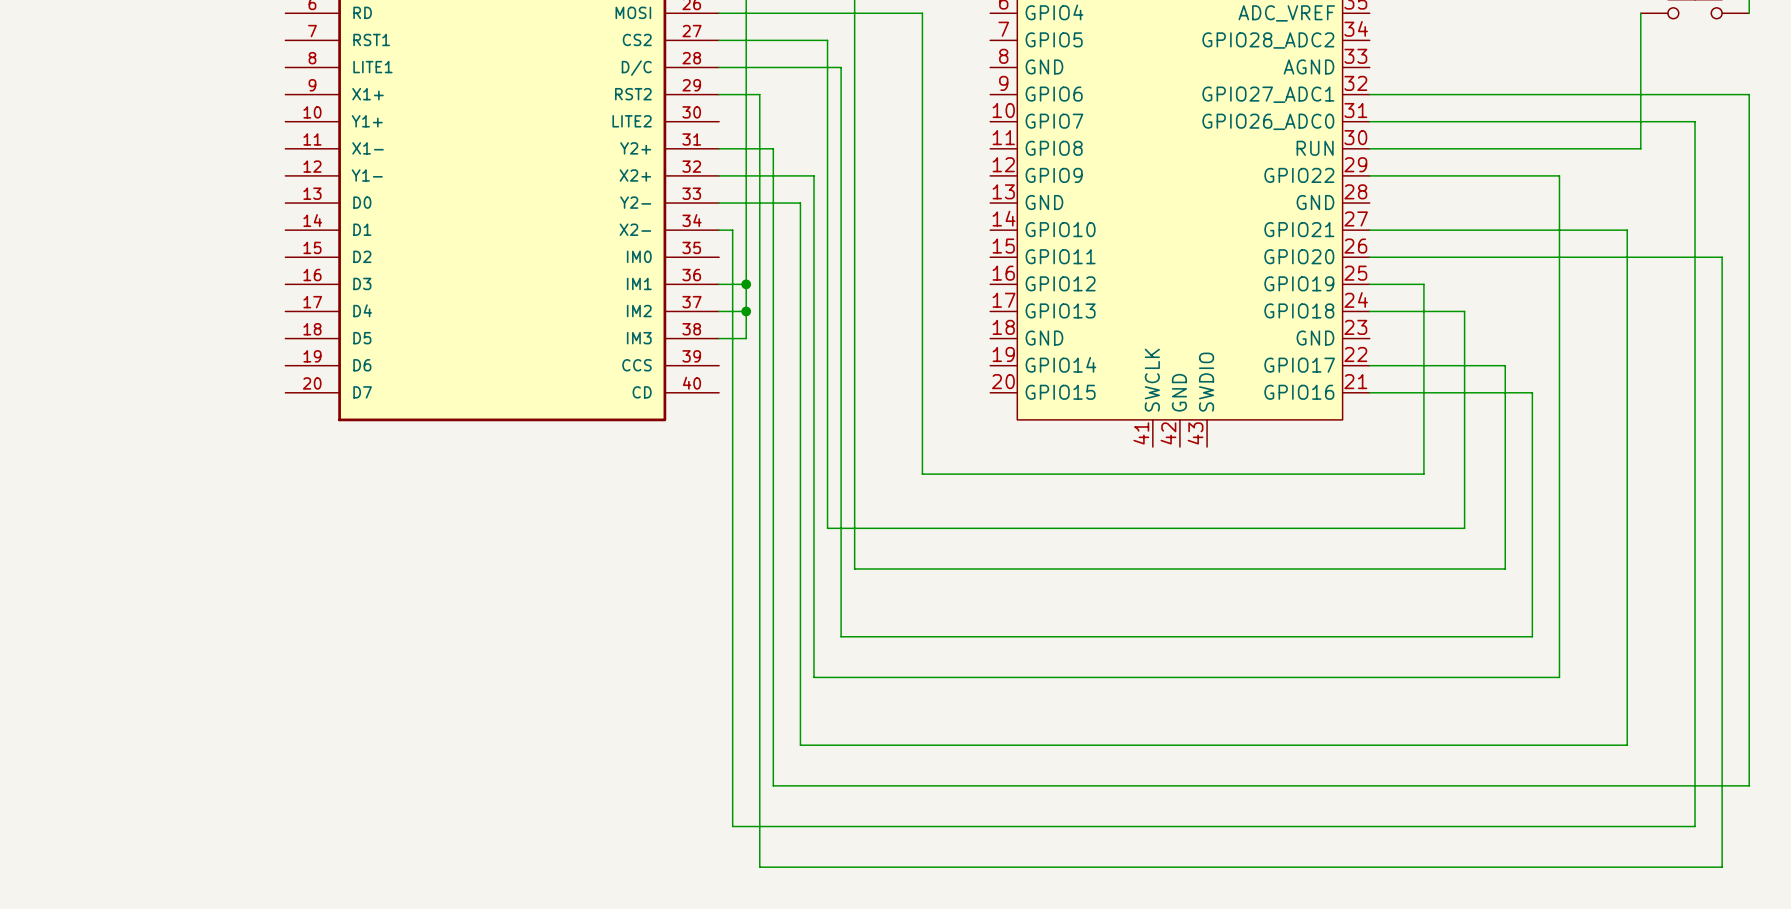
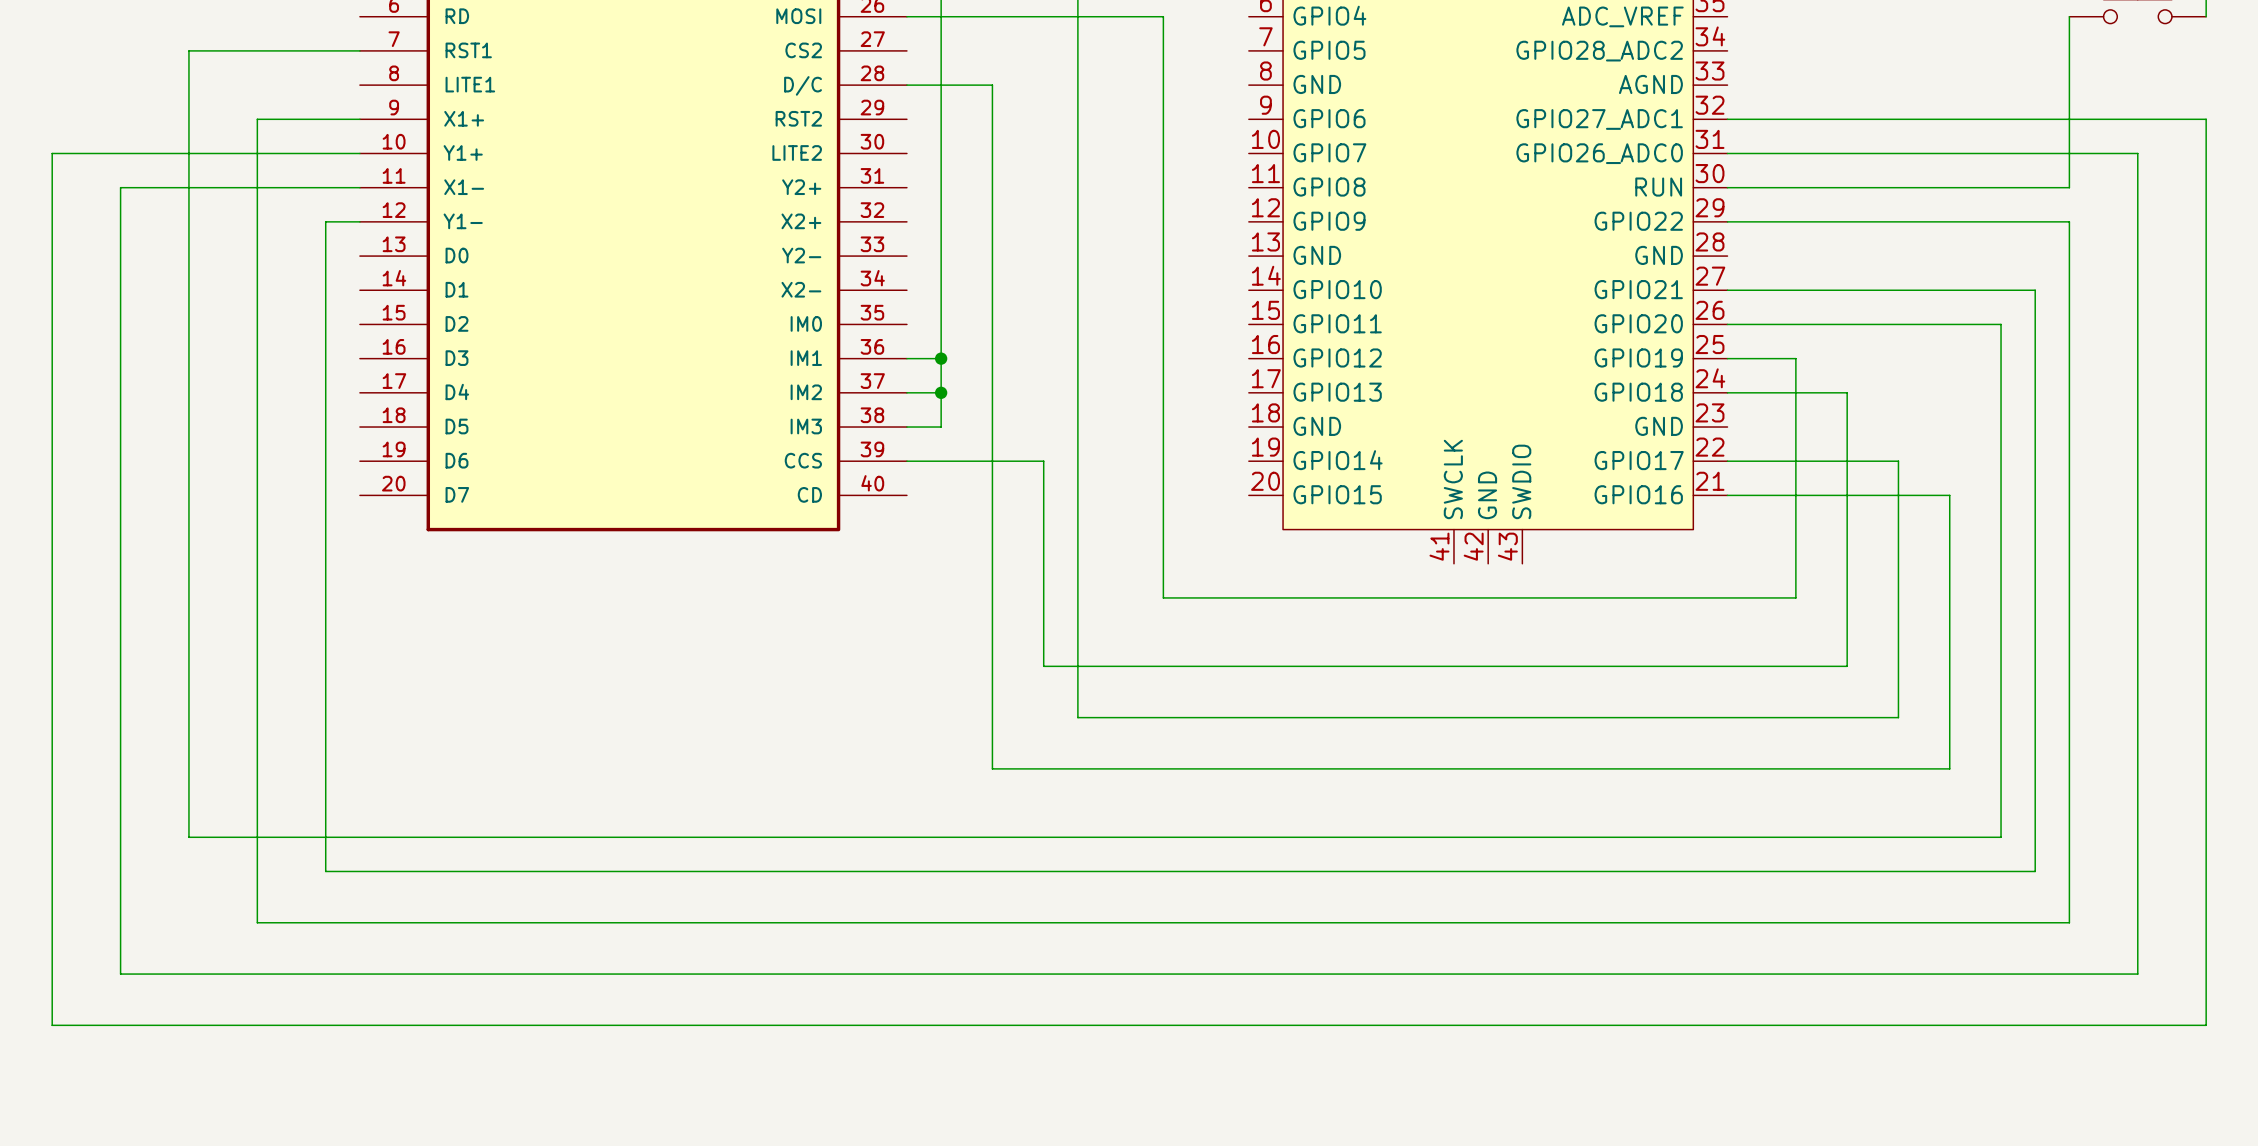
wire: (719, 40) (827, 40) (827, 365) -> (906, 461) (1043, 461)
wire: (786, 67) (841, 67) (841, 636) (1532, 636) (1532, 392) -> (992, 85) (992, 768) (1949, 768) (1949, 495) (1932, 495)
wire: (719, 94) (759, 94) (759, 867) (1722, 867) (1722, 257) (1586, 257) -> (359, 50) (188, 50) (188, 837) (2001, 837) (2001, 324)
wire: (719, 148) (773, 148) (773, 785) (1749, 785) -> (359, 153) (52, 153) (52, 1025) (2206, 1025) (2206, 991)
wire: (719, 175) (813, 175) (813, 677) (1559, 677) (1559, 175) -> (359, 119) (257, 119) (257, 922) (2069, 922) (2069, 221) (1966, 221)
wire: (719, 203) (800, 203) (800, 745) (1627, 745) (1627, 230) (1613, 230) -> (359, 221) (325, 221) (325, 871) (2035, 871) (2035, 290)
wire: (719, 230) (732, 230) (732, 826) (1695, 826) (1695, 772) -> (359, 187) (120, 187) (120, 974) (2137, 974)

